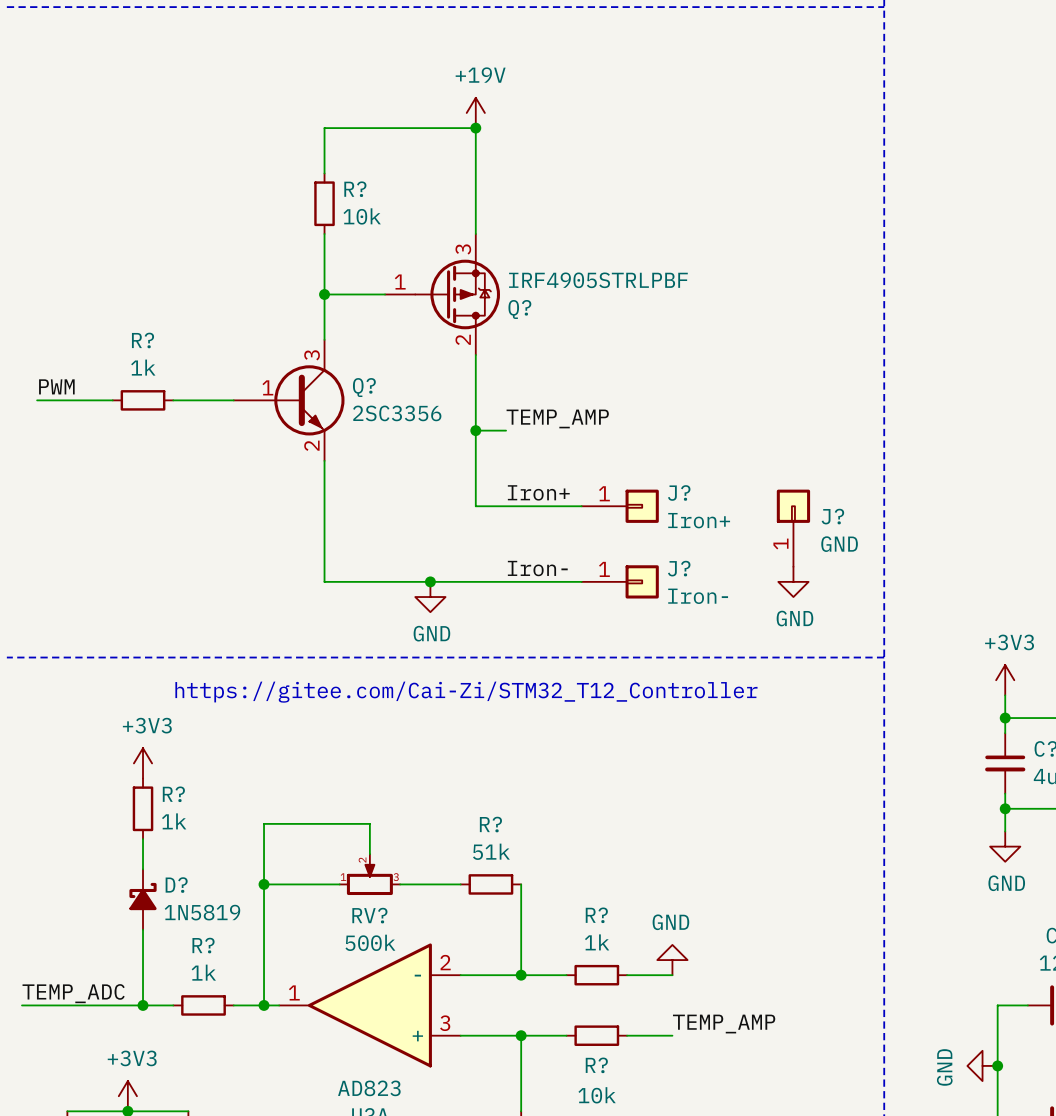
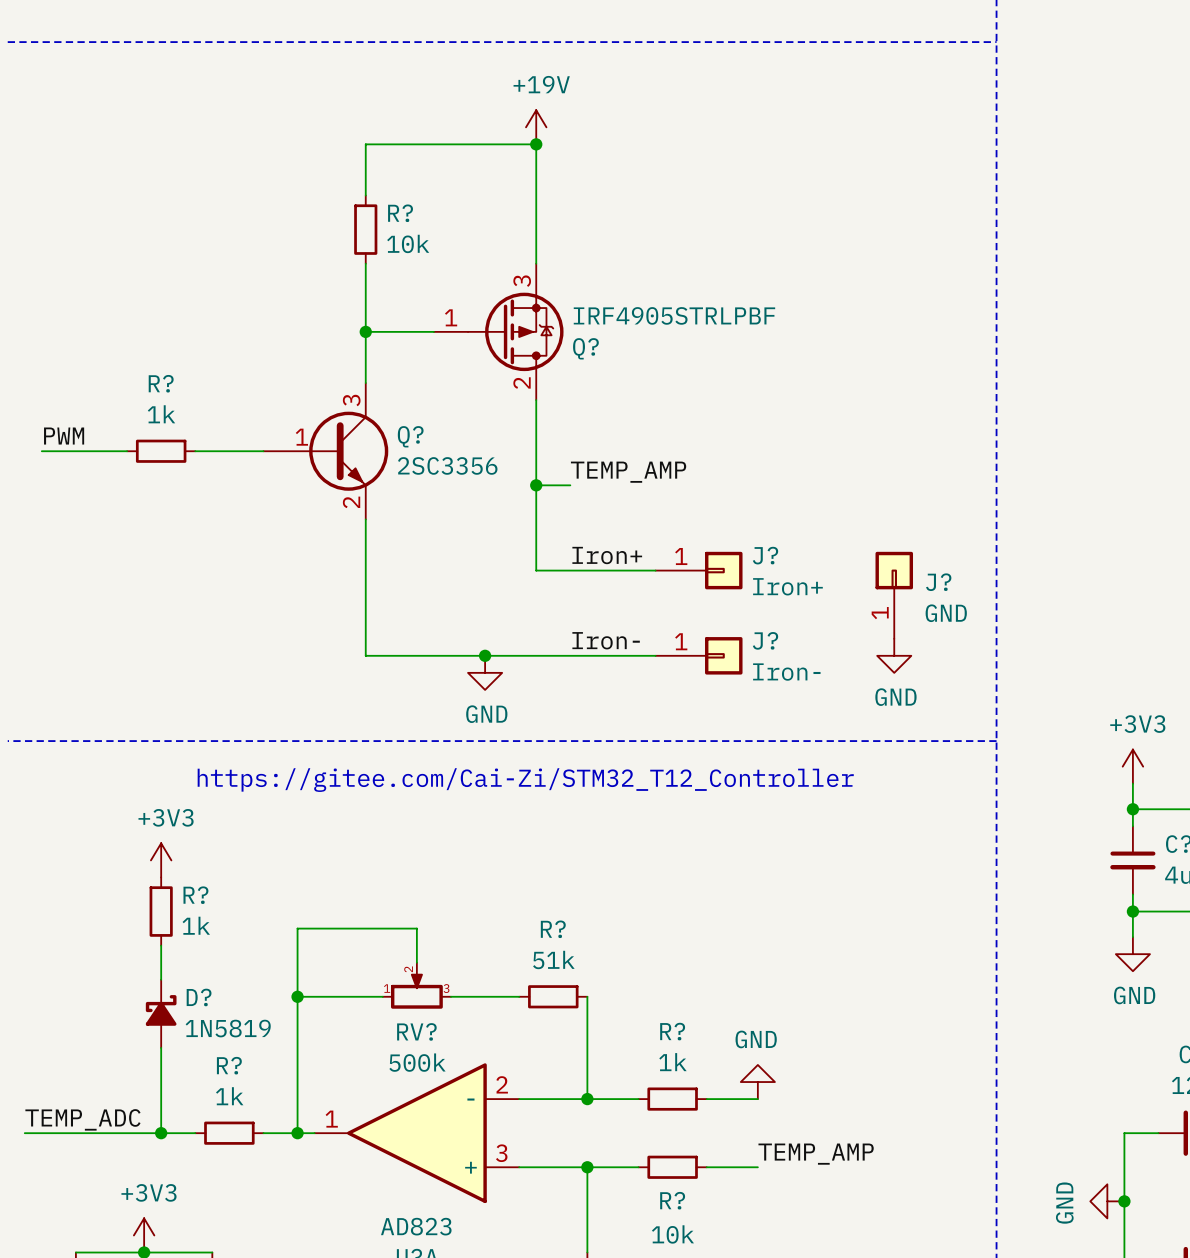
line: (6, 7) (884, 7) -> (7, 42) (996, 42)

